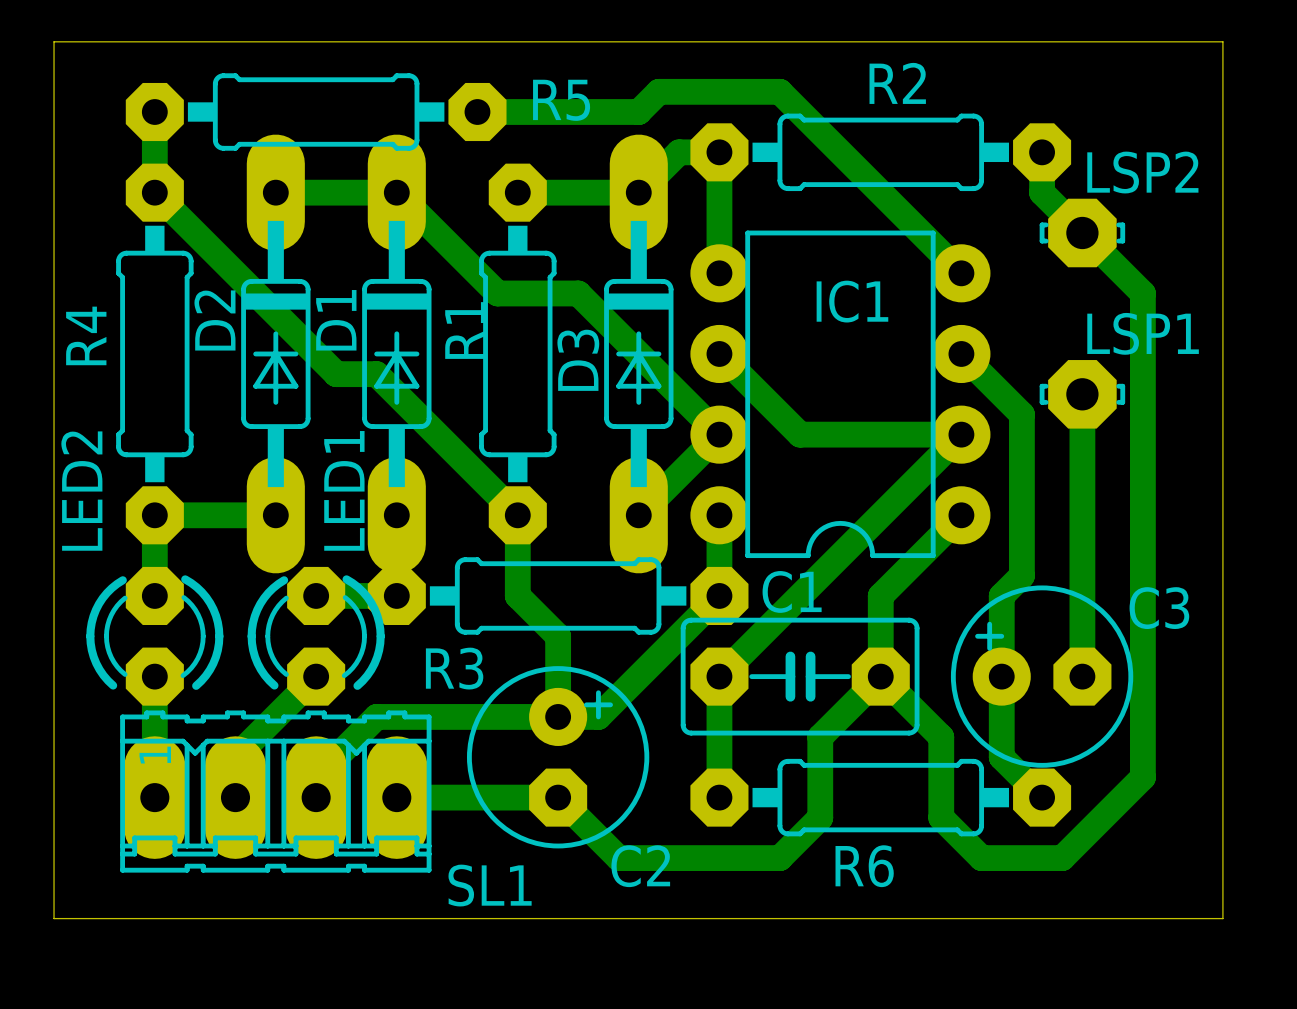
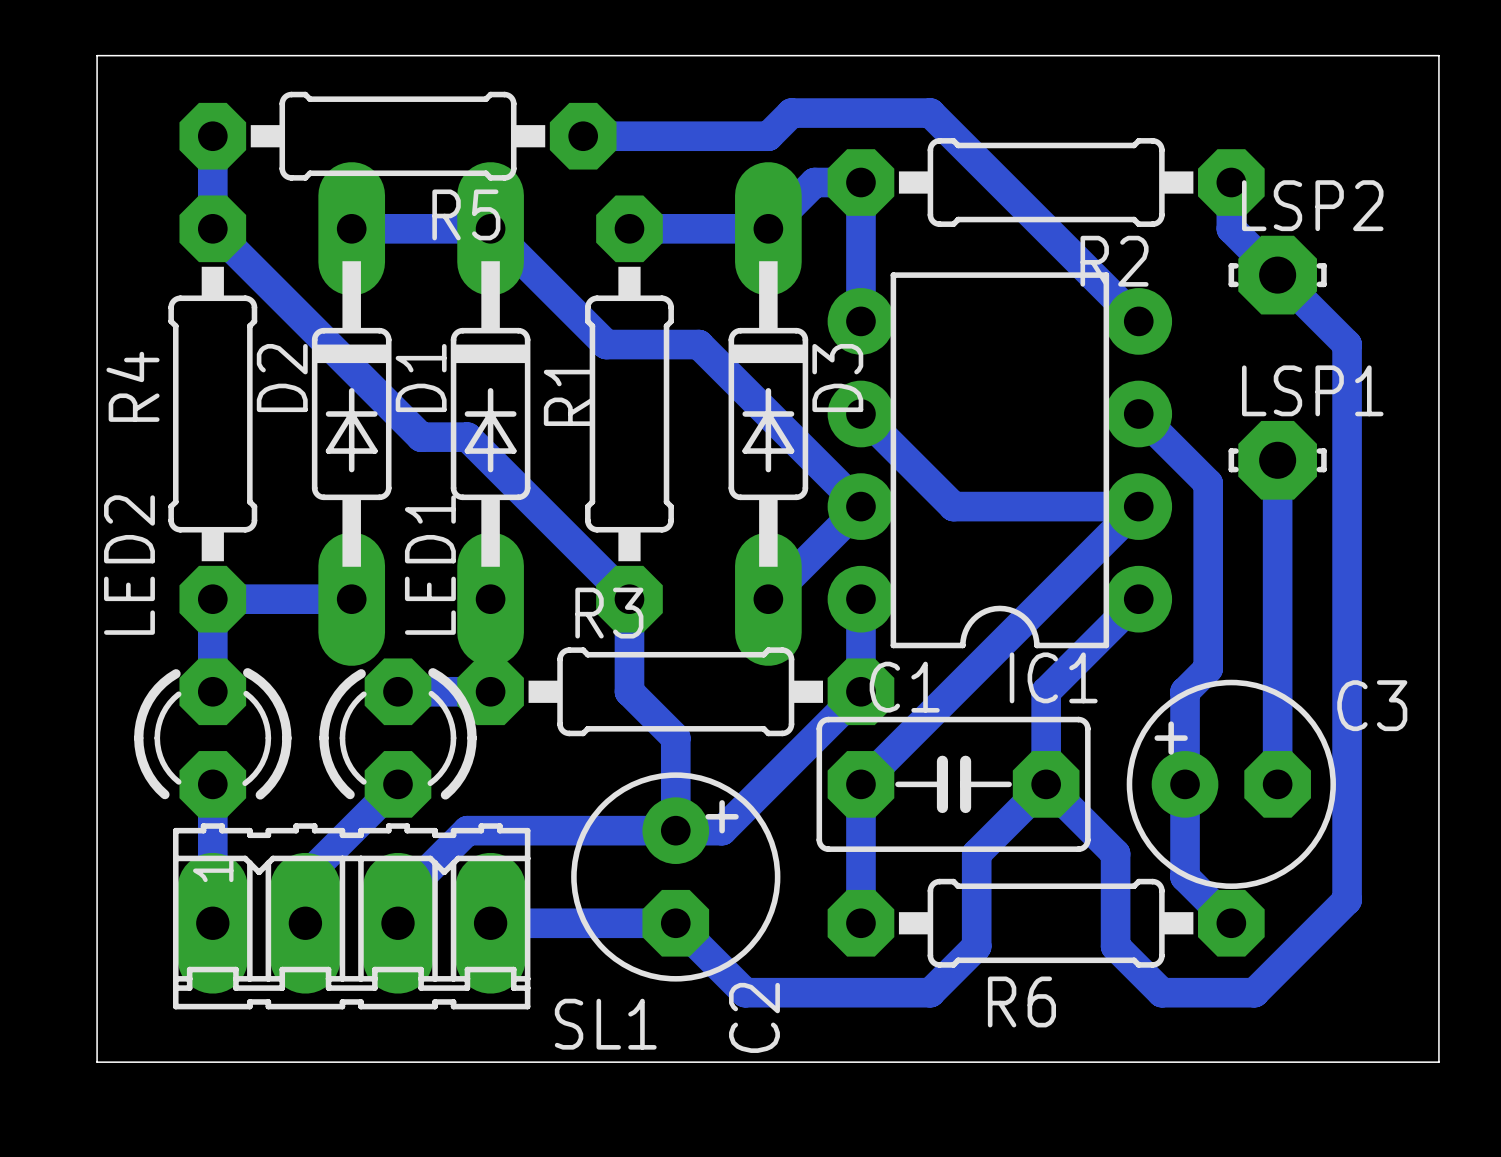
R2 name position: R2 (897, 83) -> R2 (1114, 261)
R5 name position: R5 (561, 100) -> R5 (466, 214)
LSP2 name position: LSP2 (1142, 172) -> LSP2 (1312, 205)
IC1 name position: IC1 (852, 301) -> IC1 (1053, 677)
LSP1 name position: LSP1 (1143, 333) -> LSP1 (1312, 390)
D3 name position: D3 (578, 360) -> D3 (837, 378)
C1 name position: C1 (792, 591) -> C1 (904, 687)
R3 name position: R3 (454, 668) -> R3 (609, 613)
C2 name rotation: 0° (640, 866) -> 90° counterclockwise (754, 1017)

